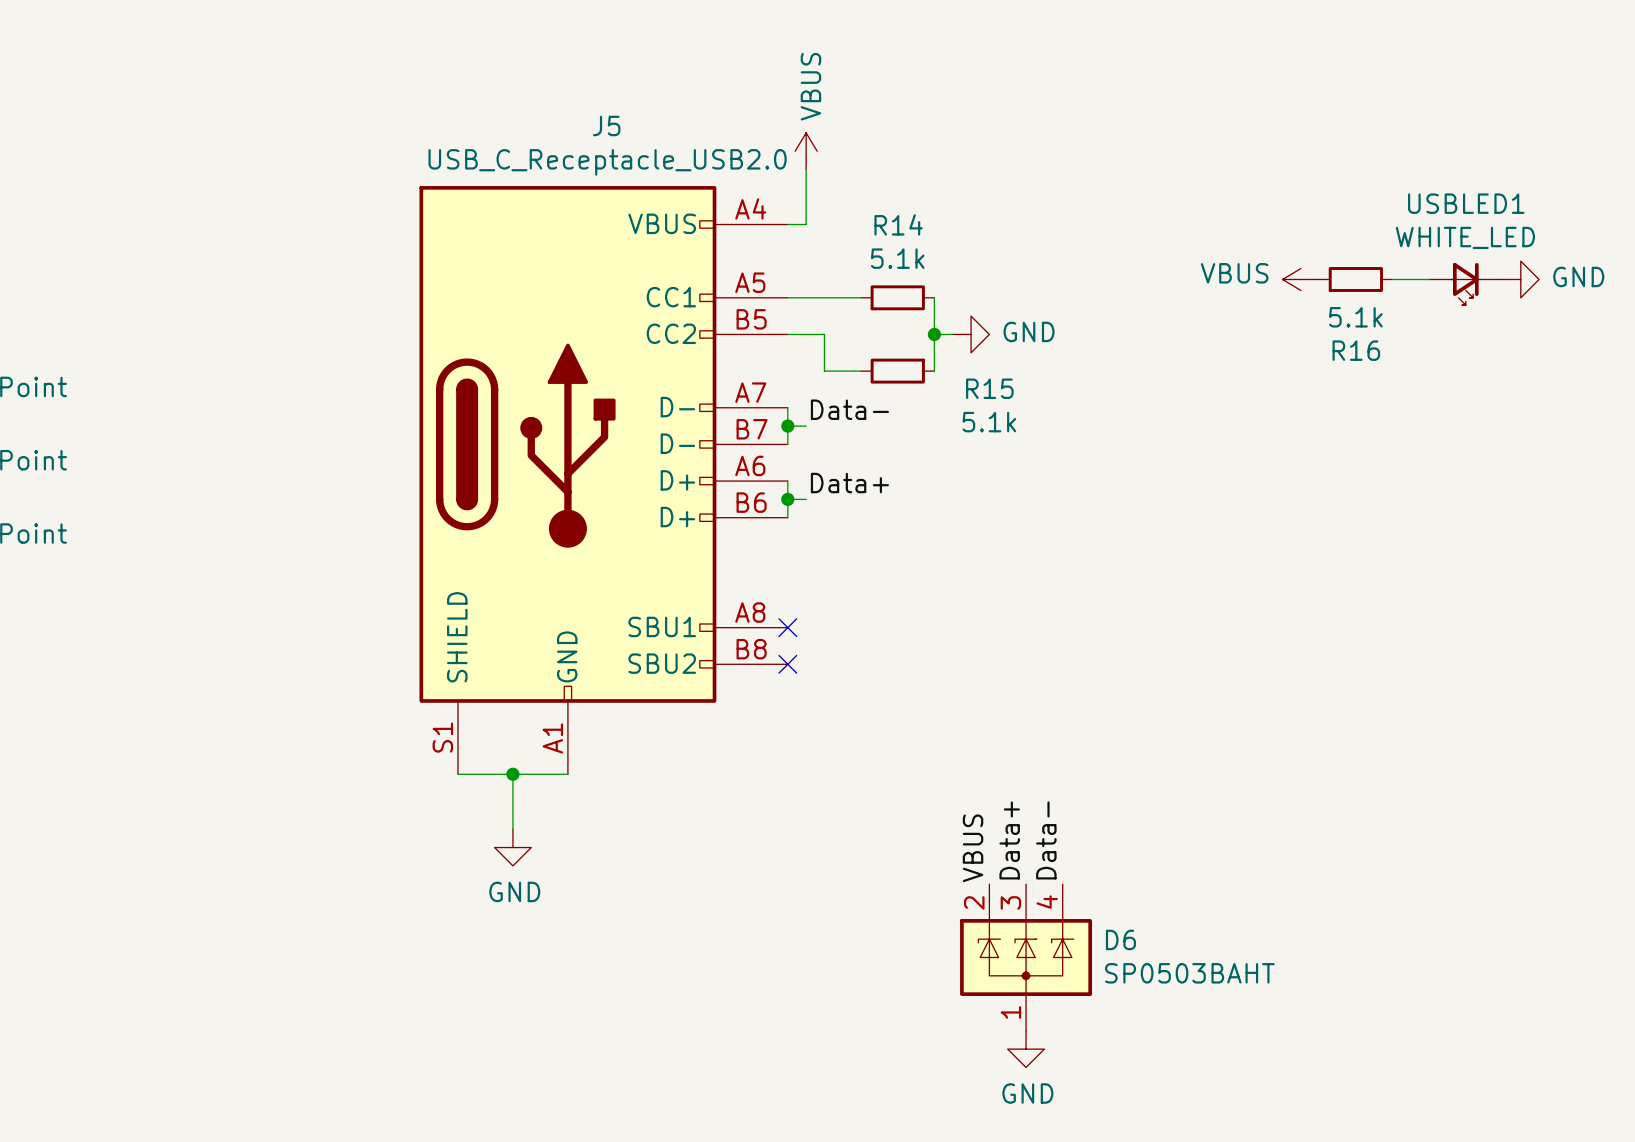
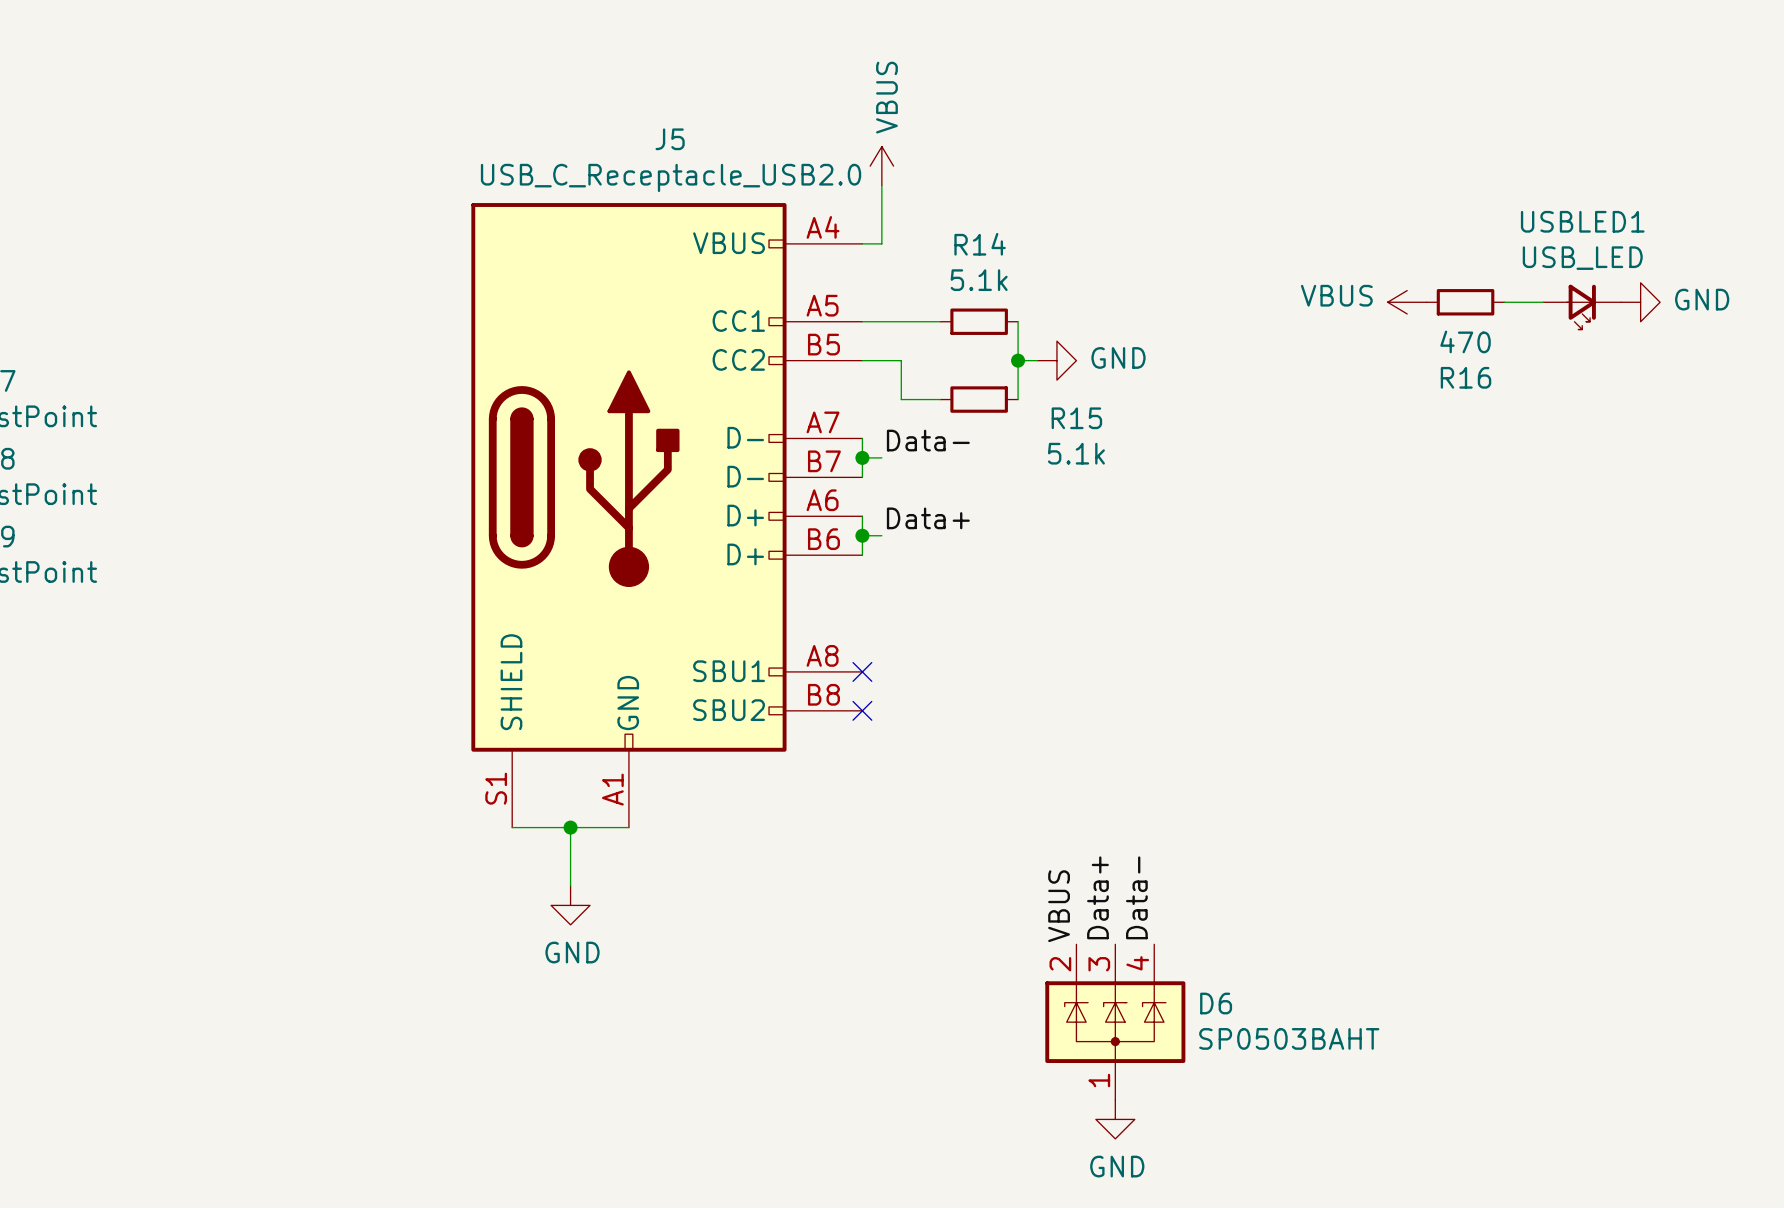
USBLED1 value: WHITE_LED (1465, 237) -> USB_LED (1582, 258)
R16 value: 5.1k (1355, 317) -> 470 (1465, 341)

